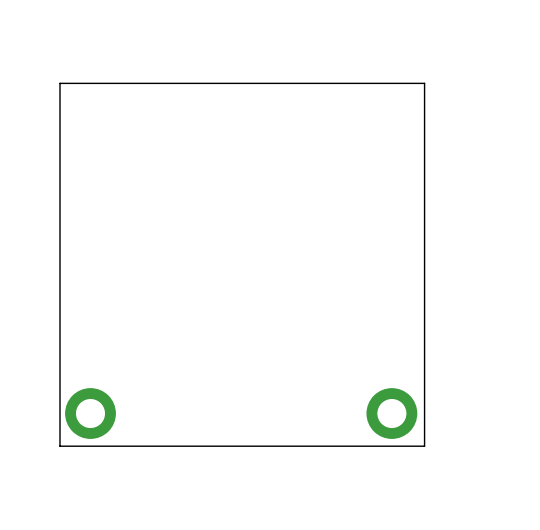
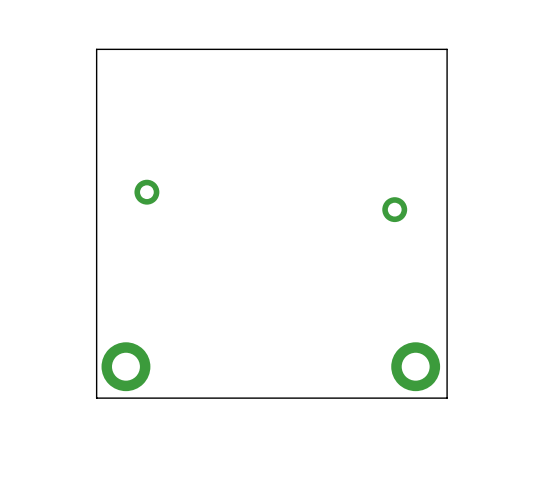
via: none -> (146, 192)
via: none -> (394, 209)

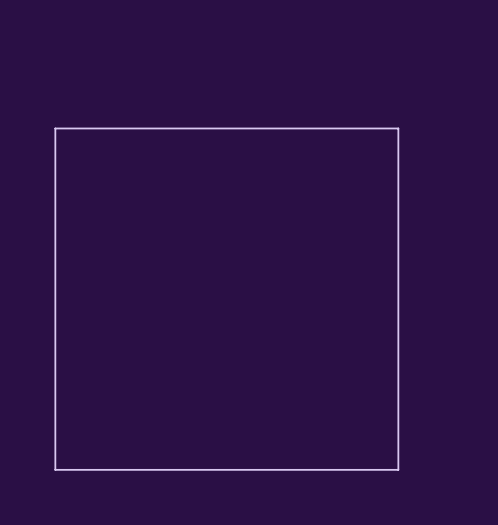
via: (146, 192) -> none
via: (394, 209) -> none
part: (125, 366) -> none
part: (415, 366) -> none

